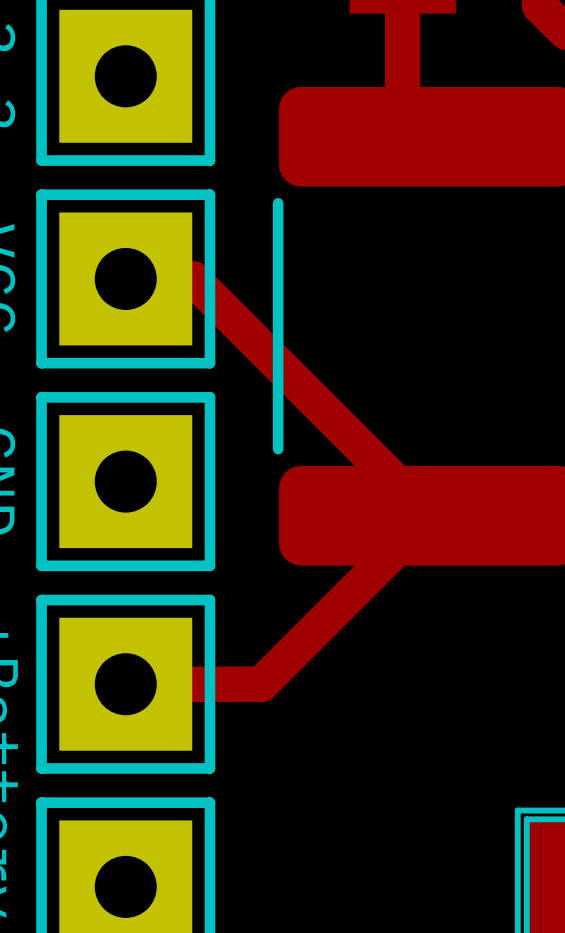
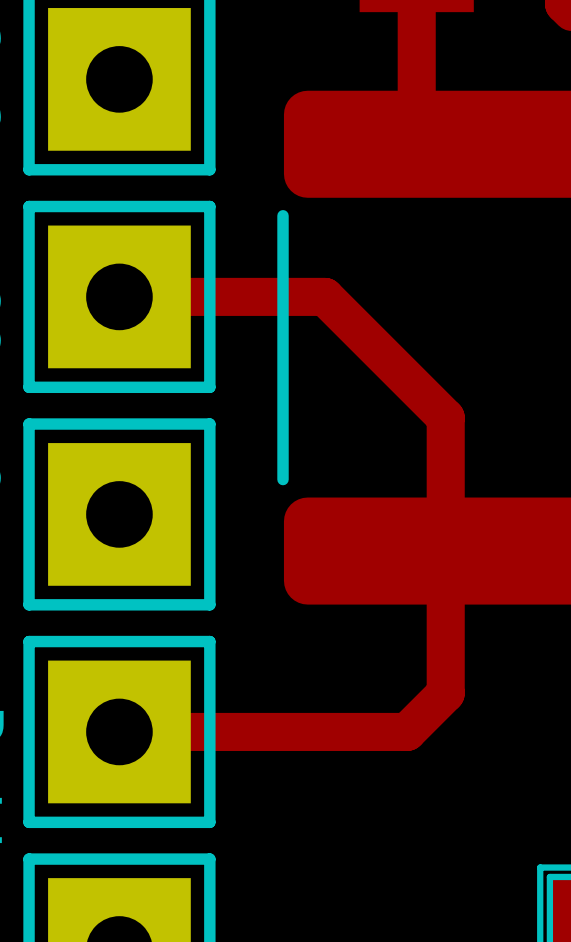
track: (192, 278) (429, 515) -> (191, 296) (324, 296) (445, 417) (445, 693) (407, 731) (264, 731)
track: (398, 547) (261, 684) -> none

